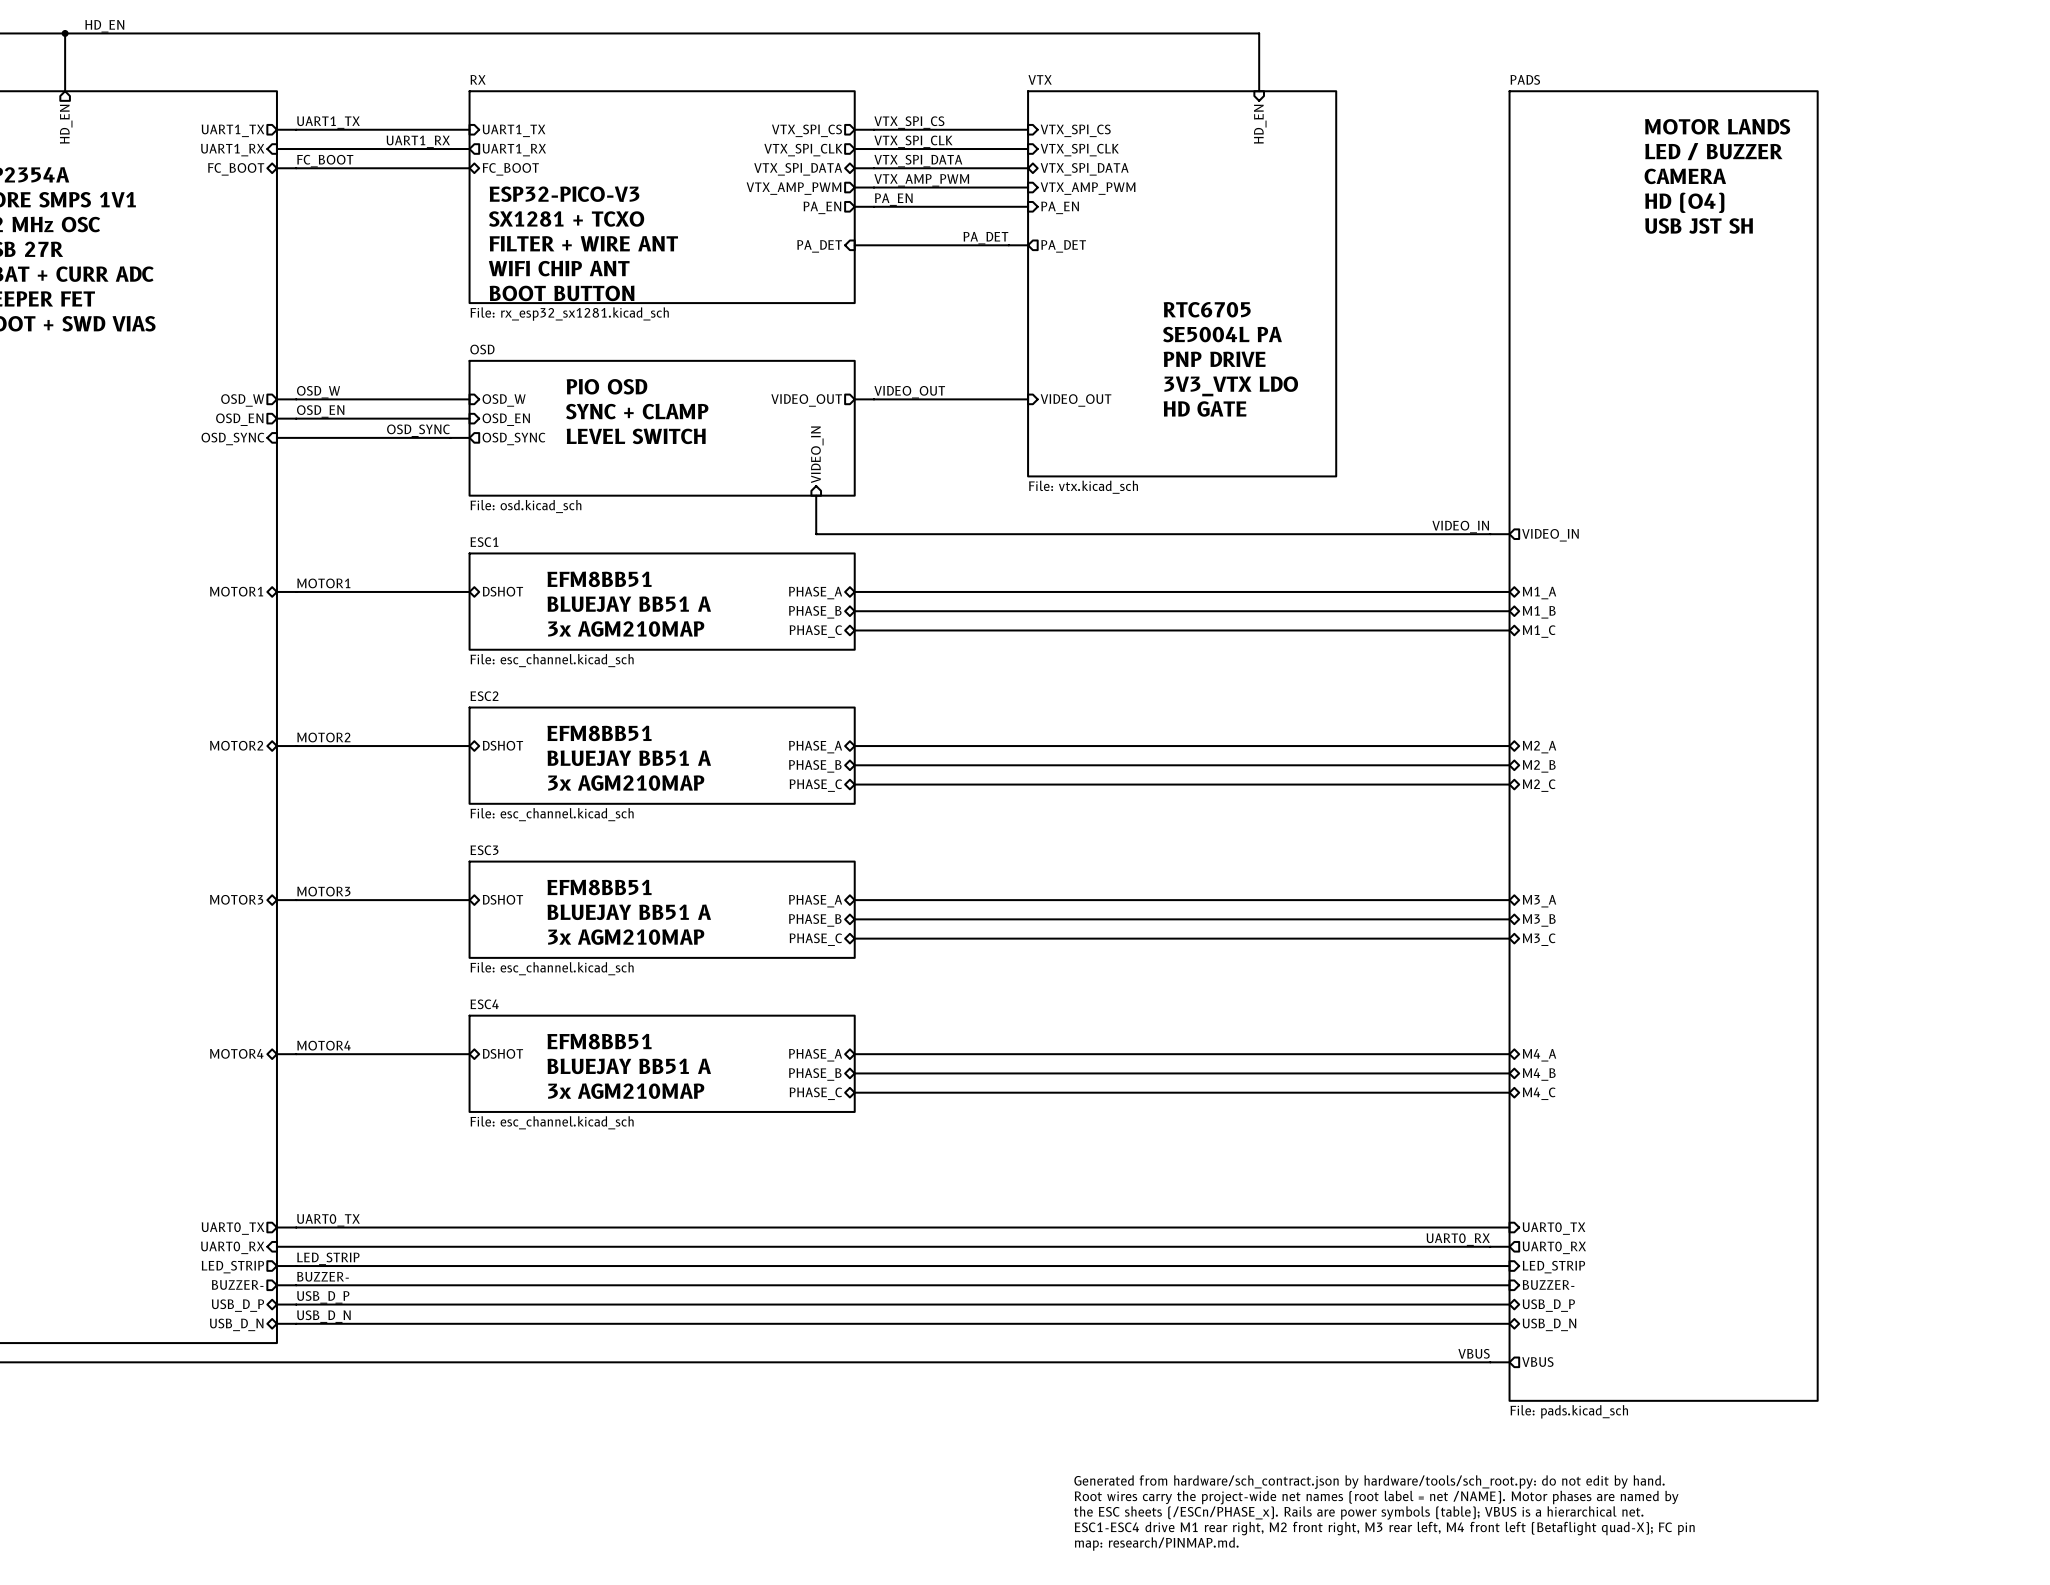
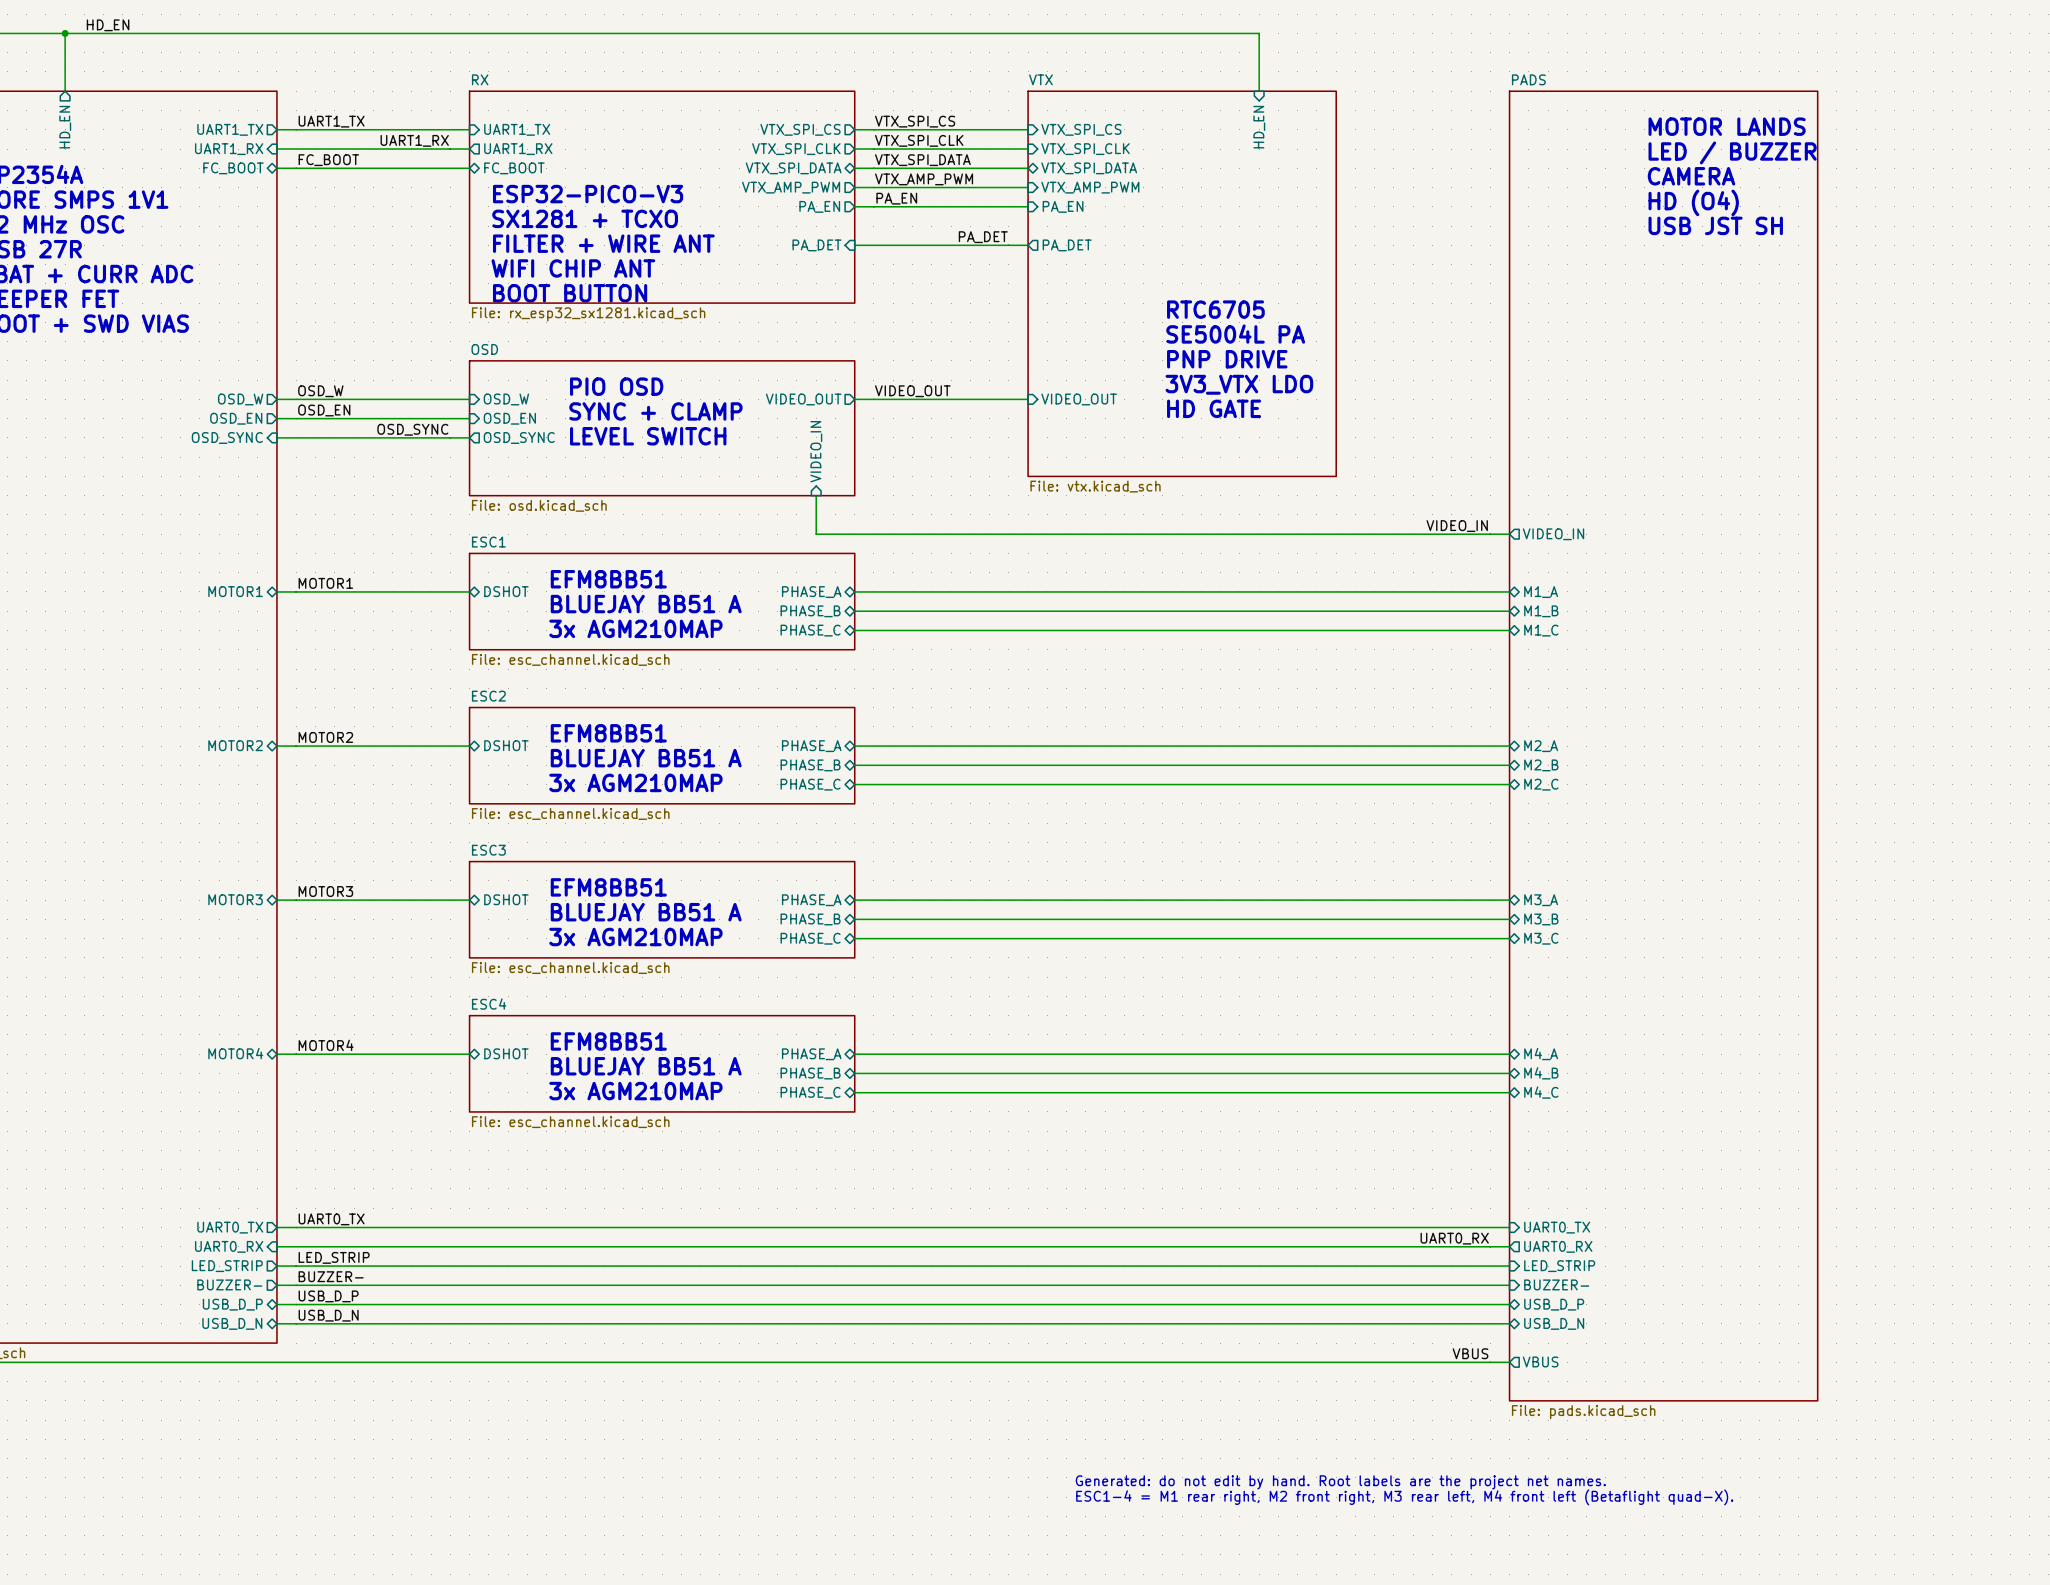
text: Generated from hardware/sch_contract.json by hardware/tools/sch_root.py: do not edit by hand. (1369, 1482) -> Generated: do not edit by hand. Root labels are the project net names. (1340, 1482)
text: Root wires carry the project-wide net names (root label = net /NAME). Motor phases are named by (1376, 1497) -> ESC1-4 = M1 rear right, M2 front right, M3 rear left, M4 front left (Betaflight quad-X). (1404, 1497)
text: the ESC sheets (/ESCn/PHASE_x). Rails are power symbols (table); VBUS is a hierarchical net. (1358, 1513) -> none
text: ESC1-ESC4 drive M1 rear right, M2 front right, M3 rear left, M4 front left (Betaflight quad-X); FC pin (1384, 1528) -> none
text: map: research/PINMAP.md. (1156, 1544) -> none

